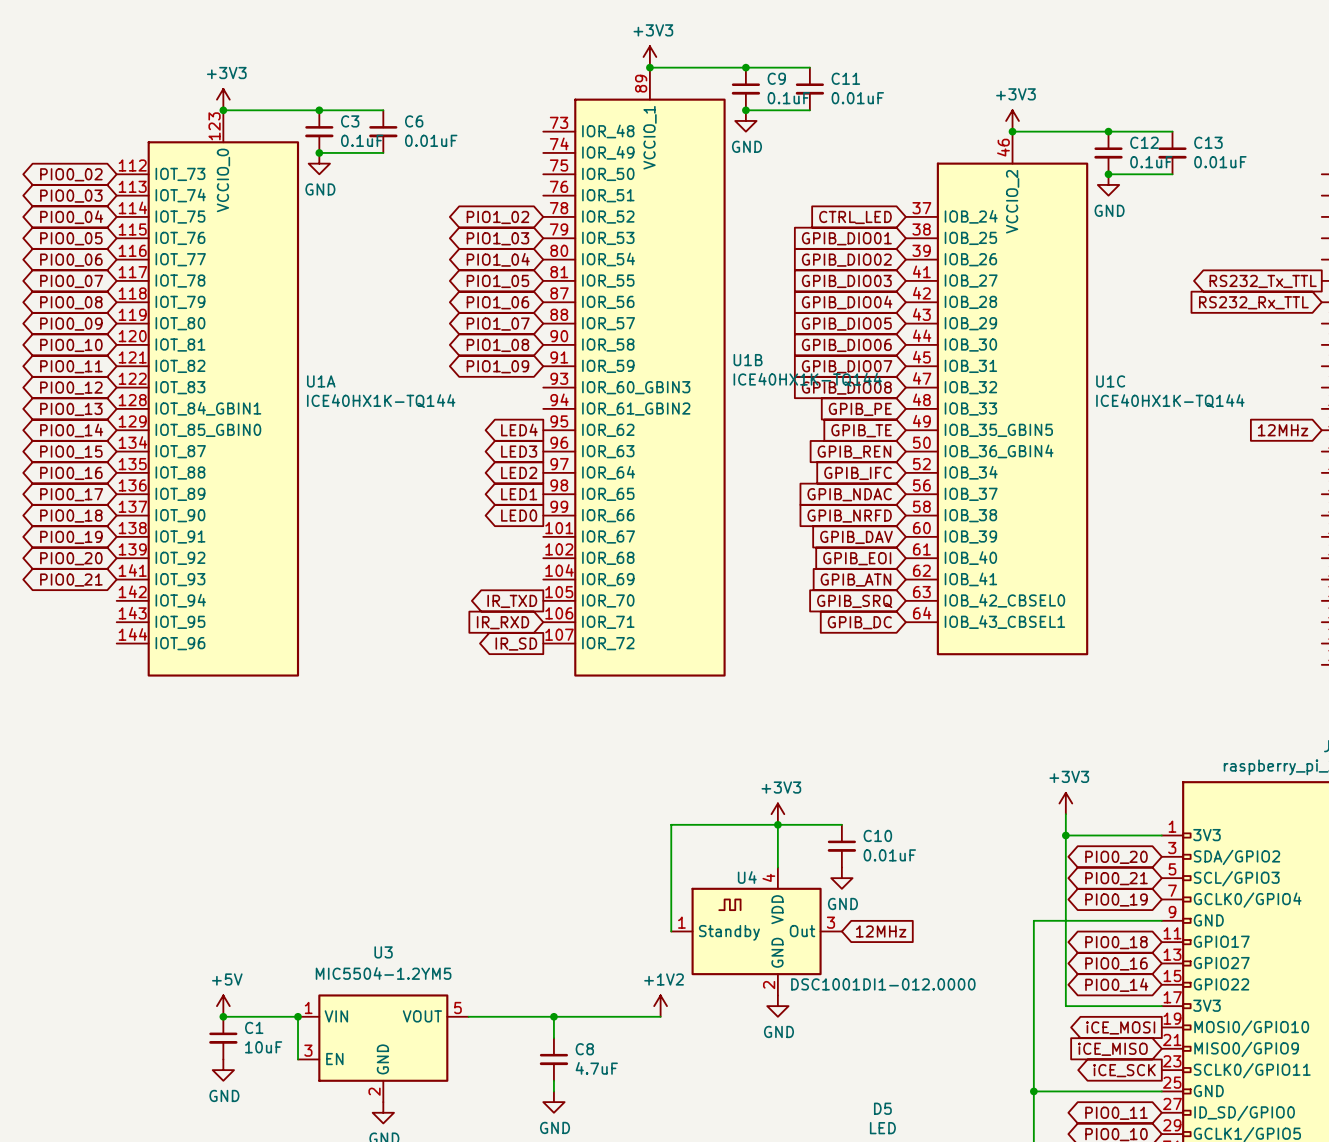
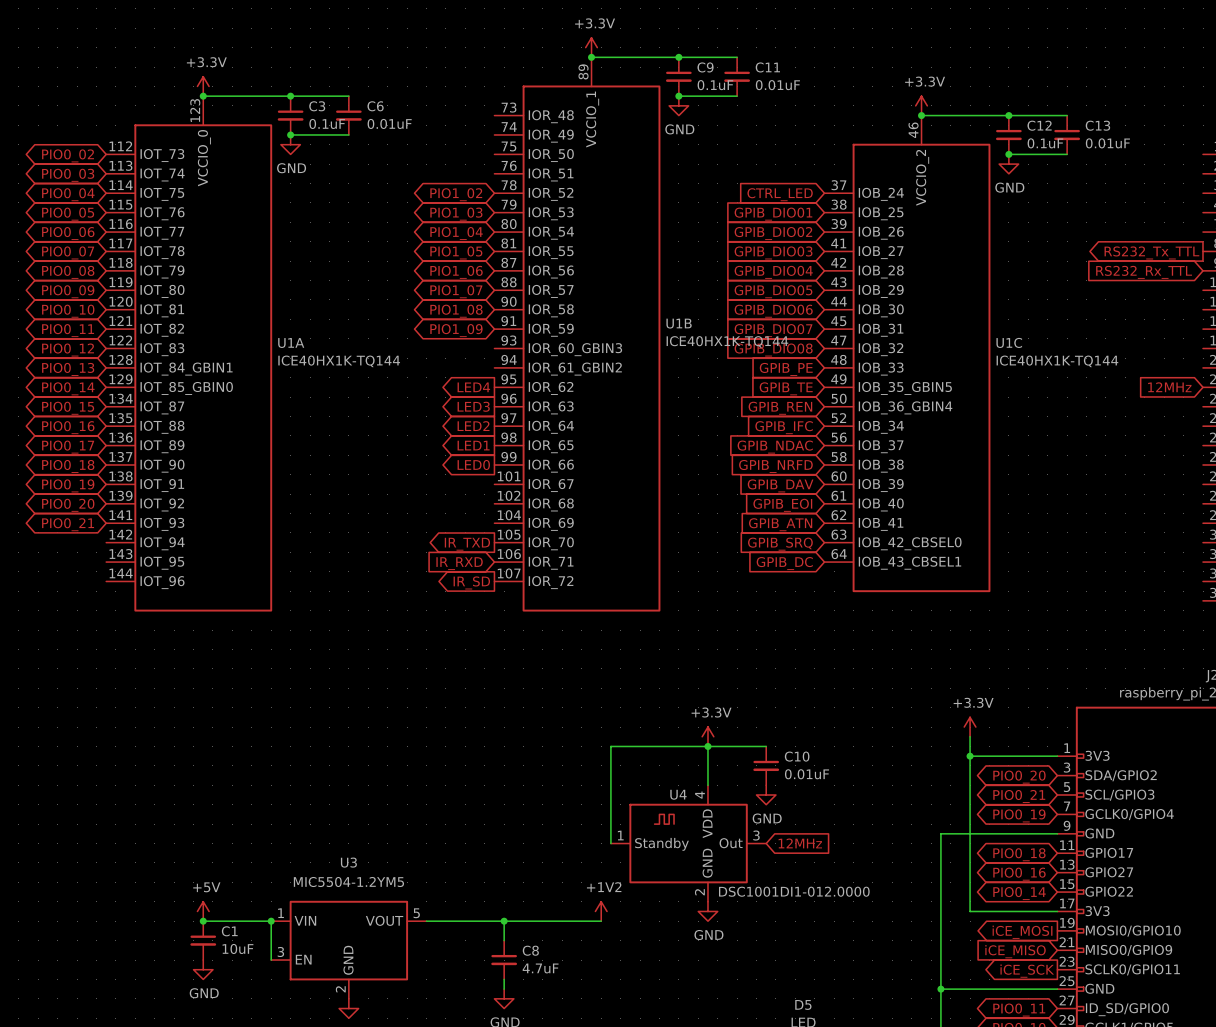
power symbol: +3V3 (649, 56) -> +3.3V (591, 47)
power symbol: +3V3 (223, 99) -> +3.3V (203, 86)
power symbol: +3V3 (1012, 120) -> +3.3V (921, 105)
power symbol: +3V3 (1065, 803) -> +3.3V (970, 727)
power symbol: +3V3 (777, 814) -> +3.3V (707, 736)

